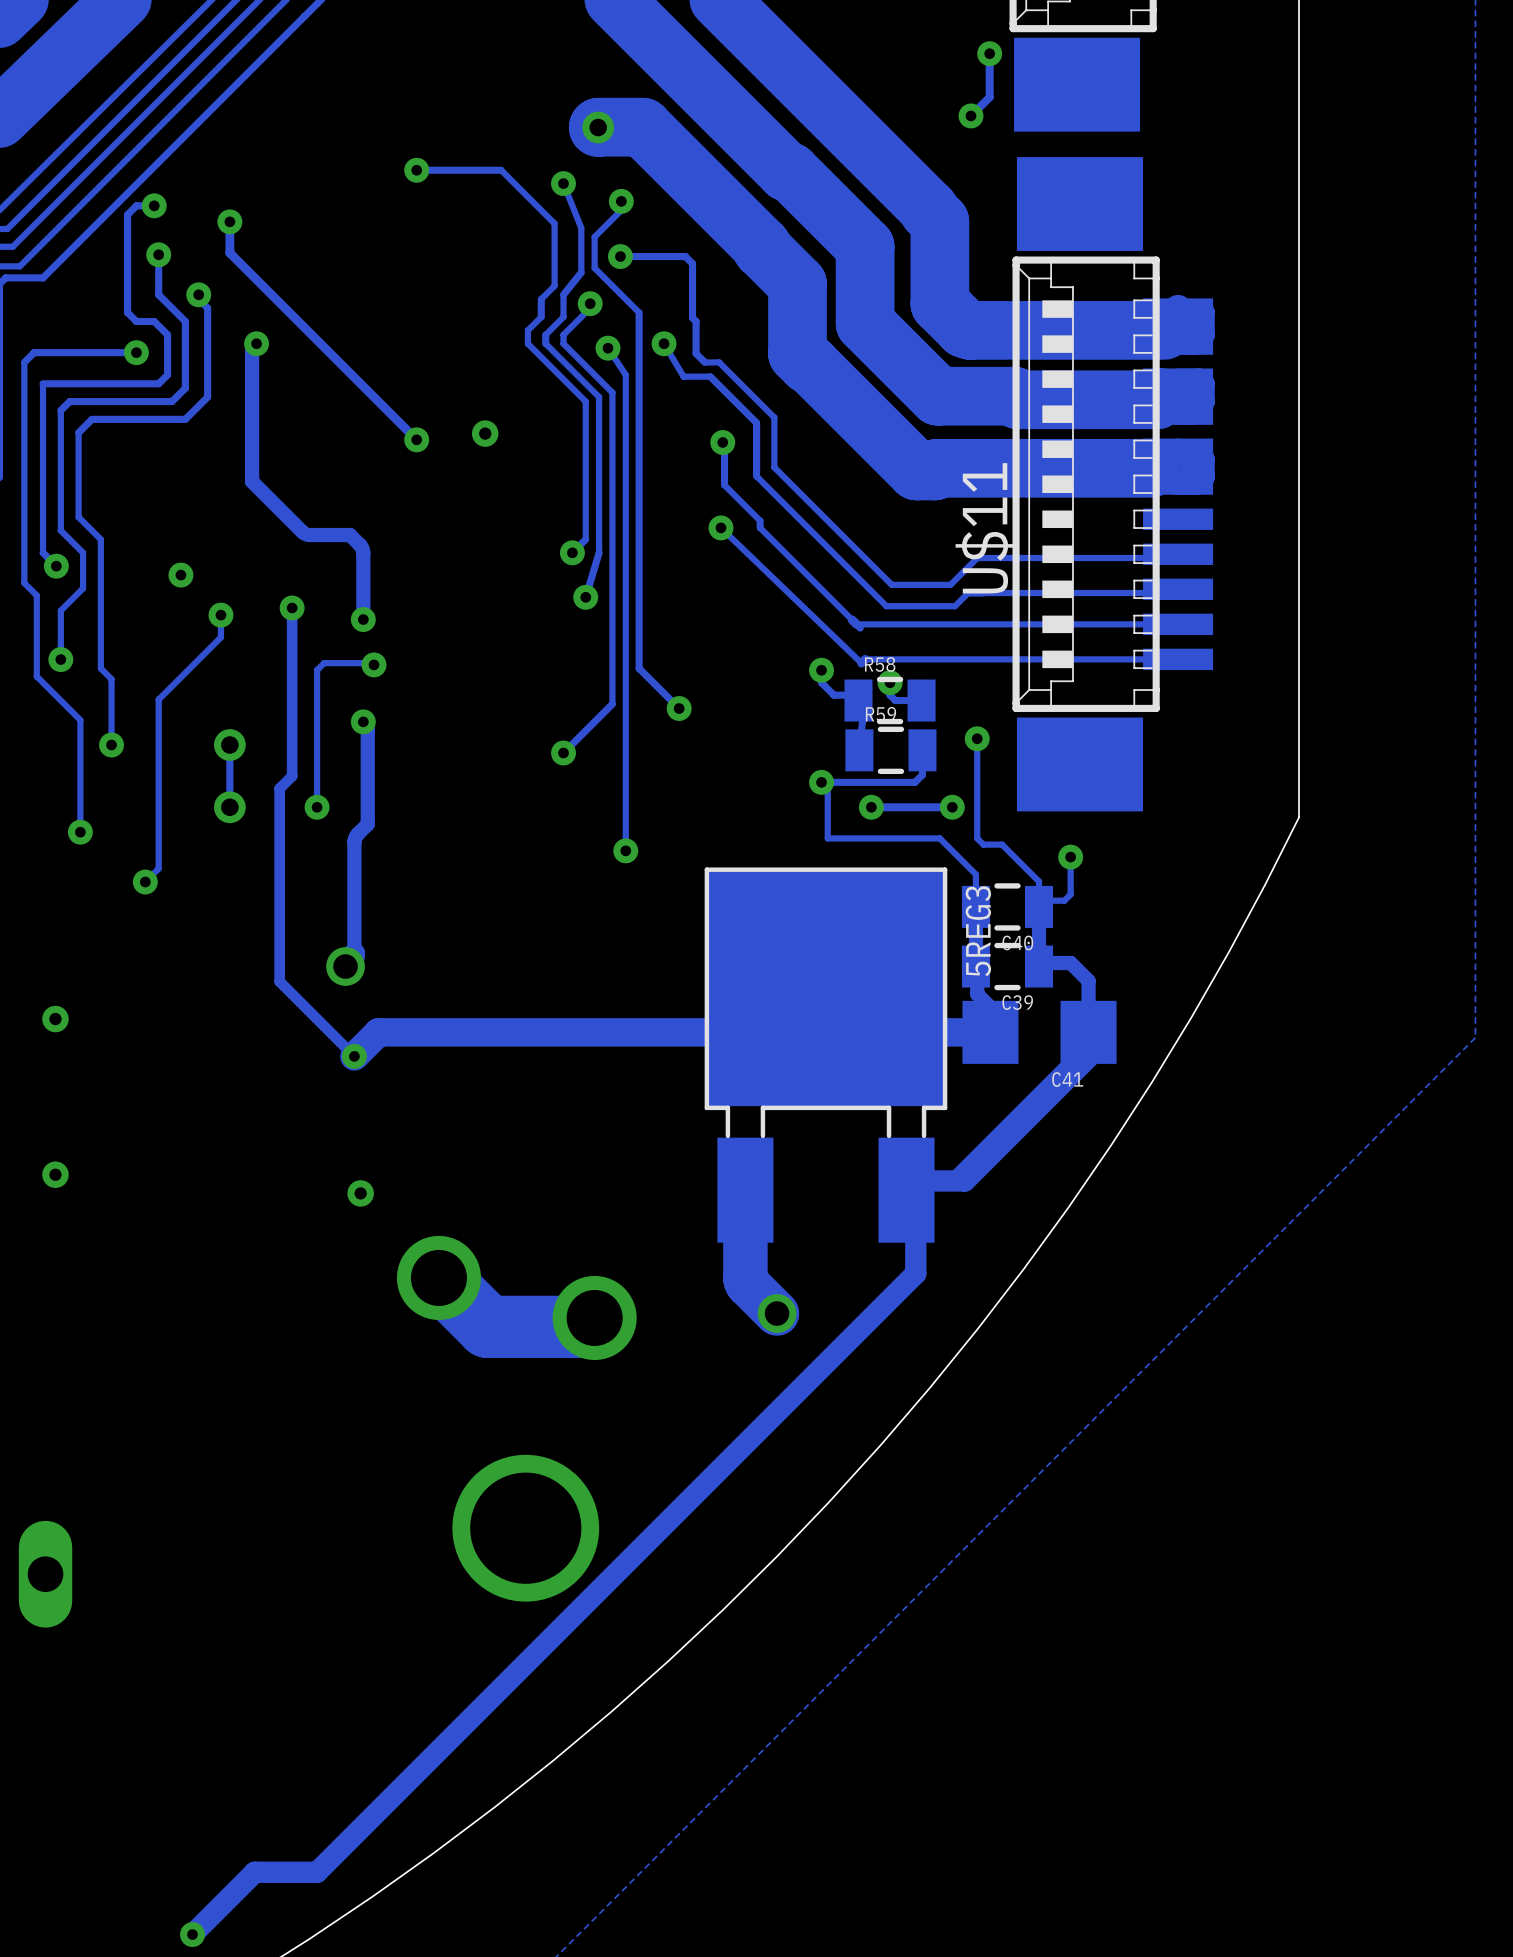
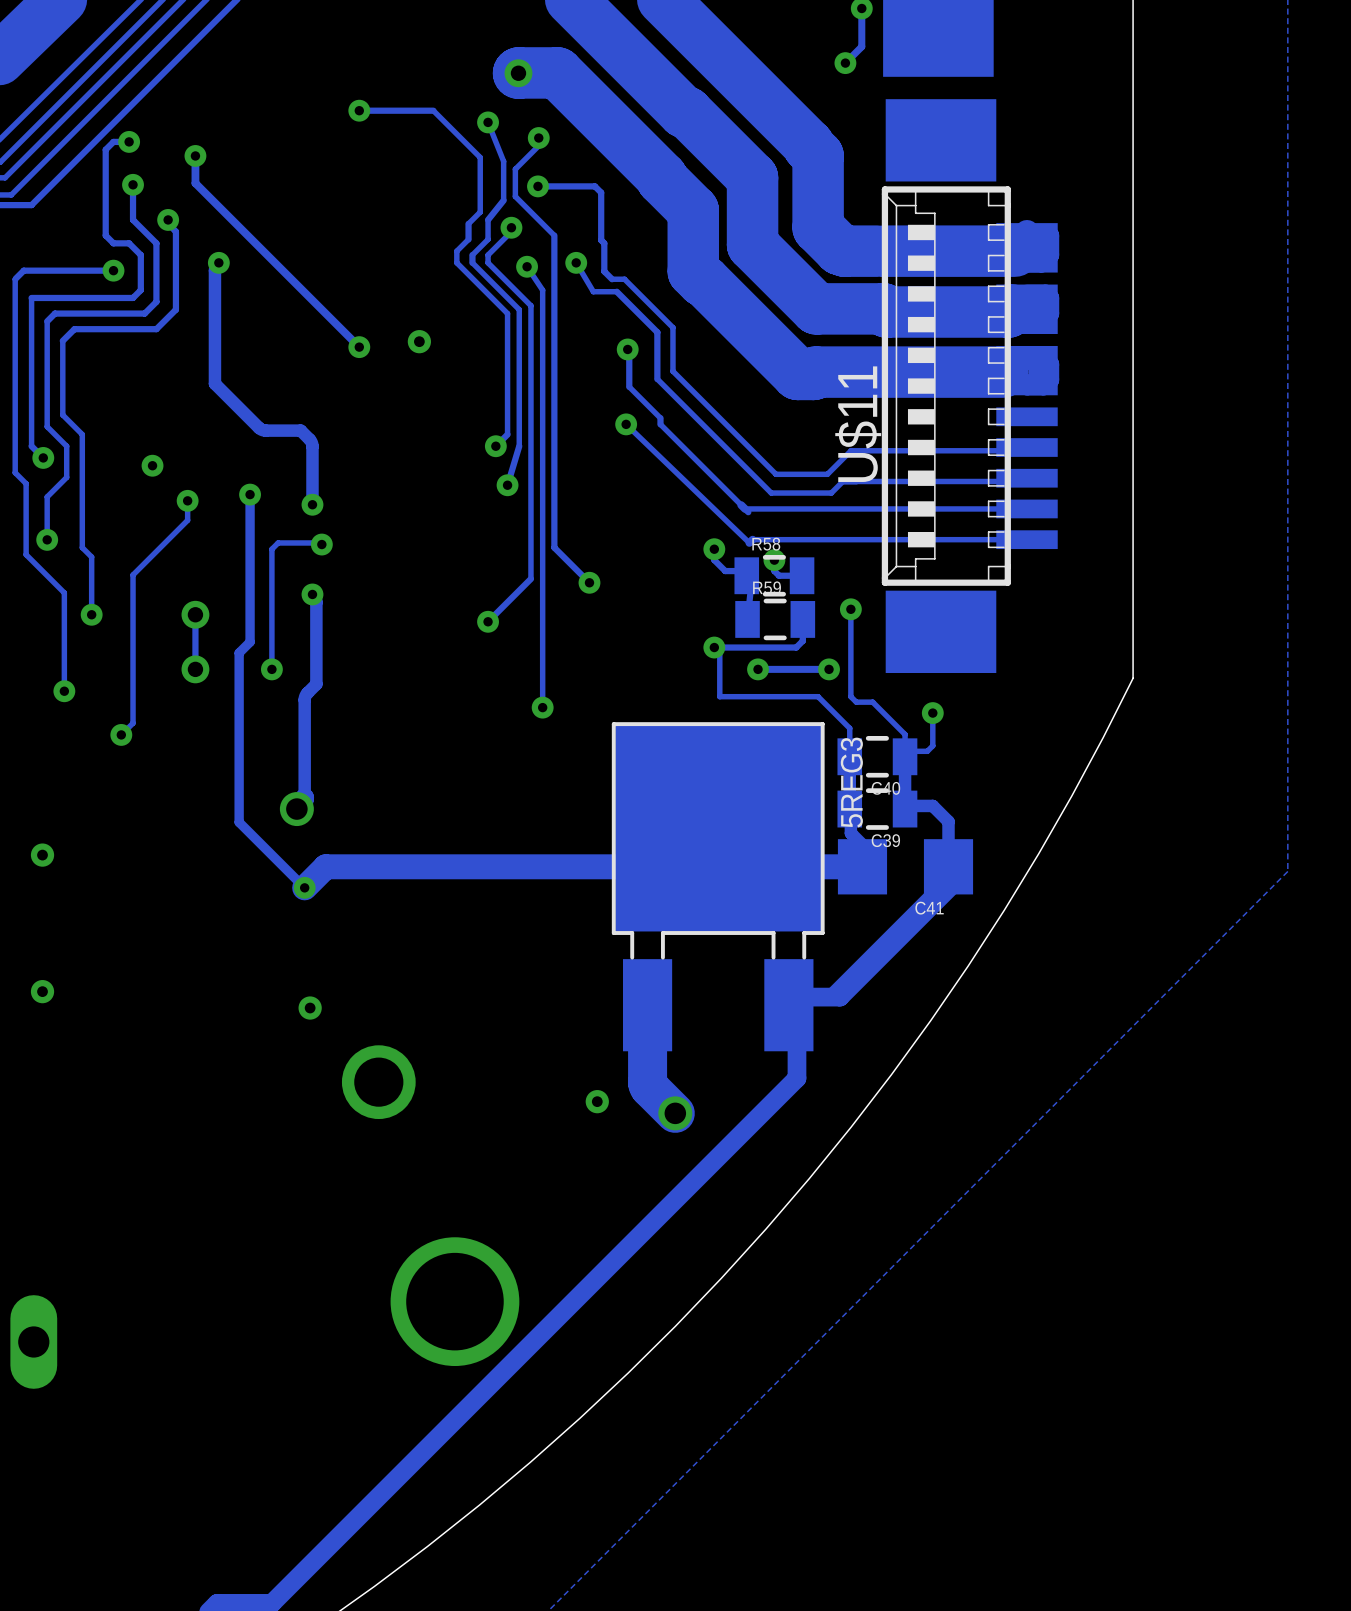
track: (438, 1277) (487, 1326) (583, 1326) (594, 1317) -> none
via: none -> (597, 1101)
via: (594, 1317) -> none

